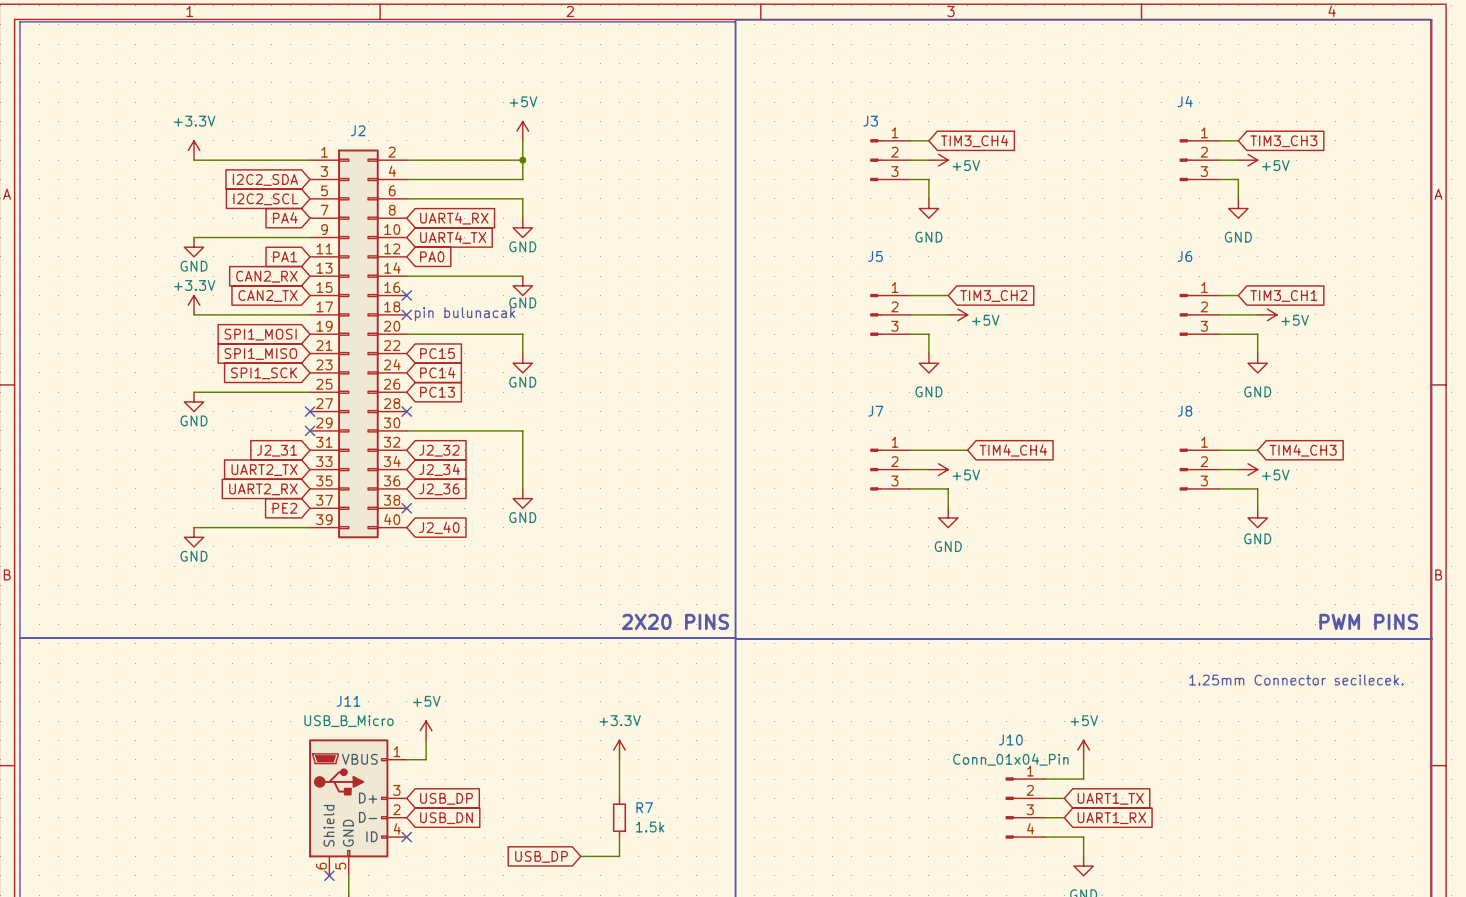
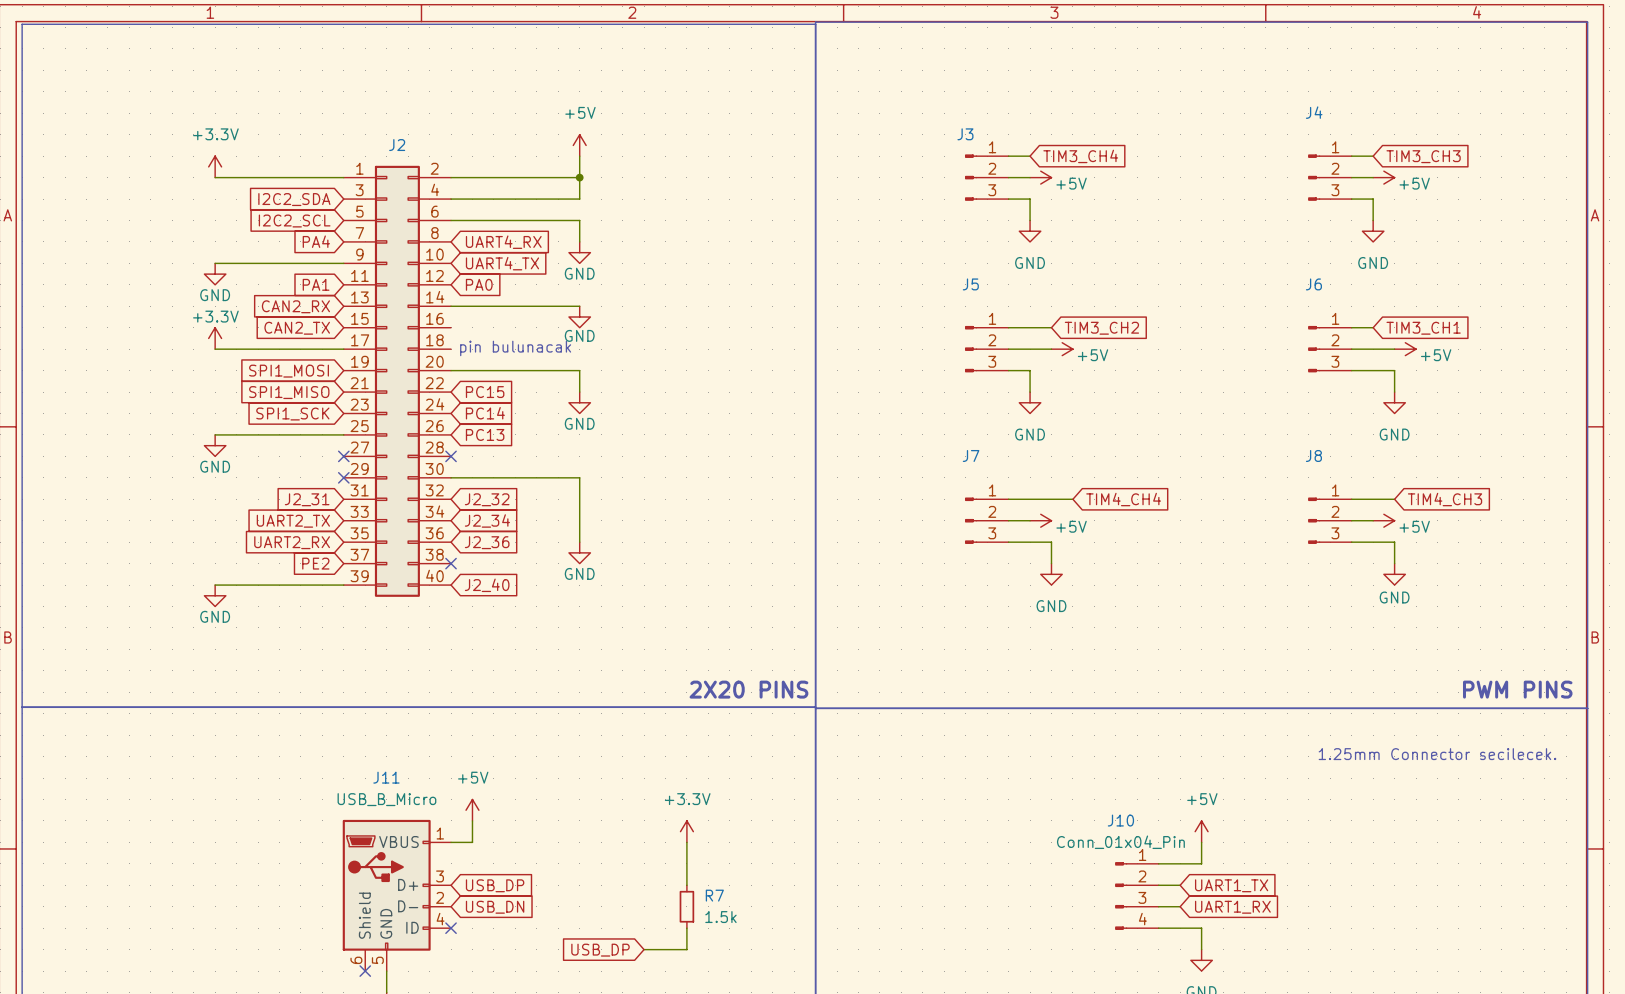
no-connect mark: (406, 295) -> none
no-connect mark: (406, 314) -> none

